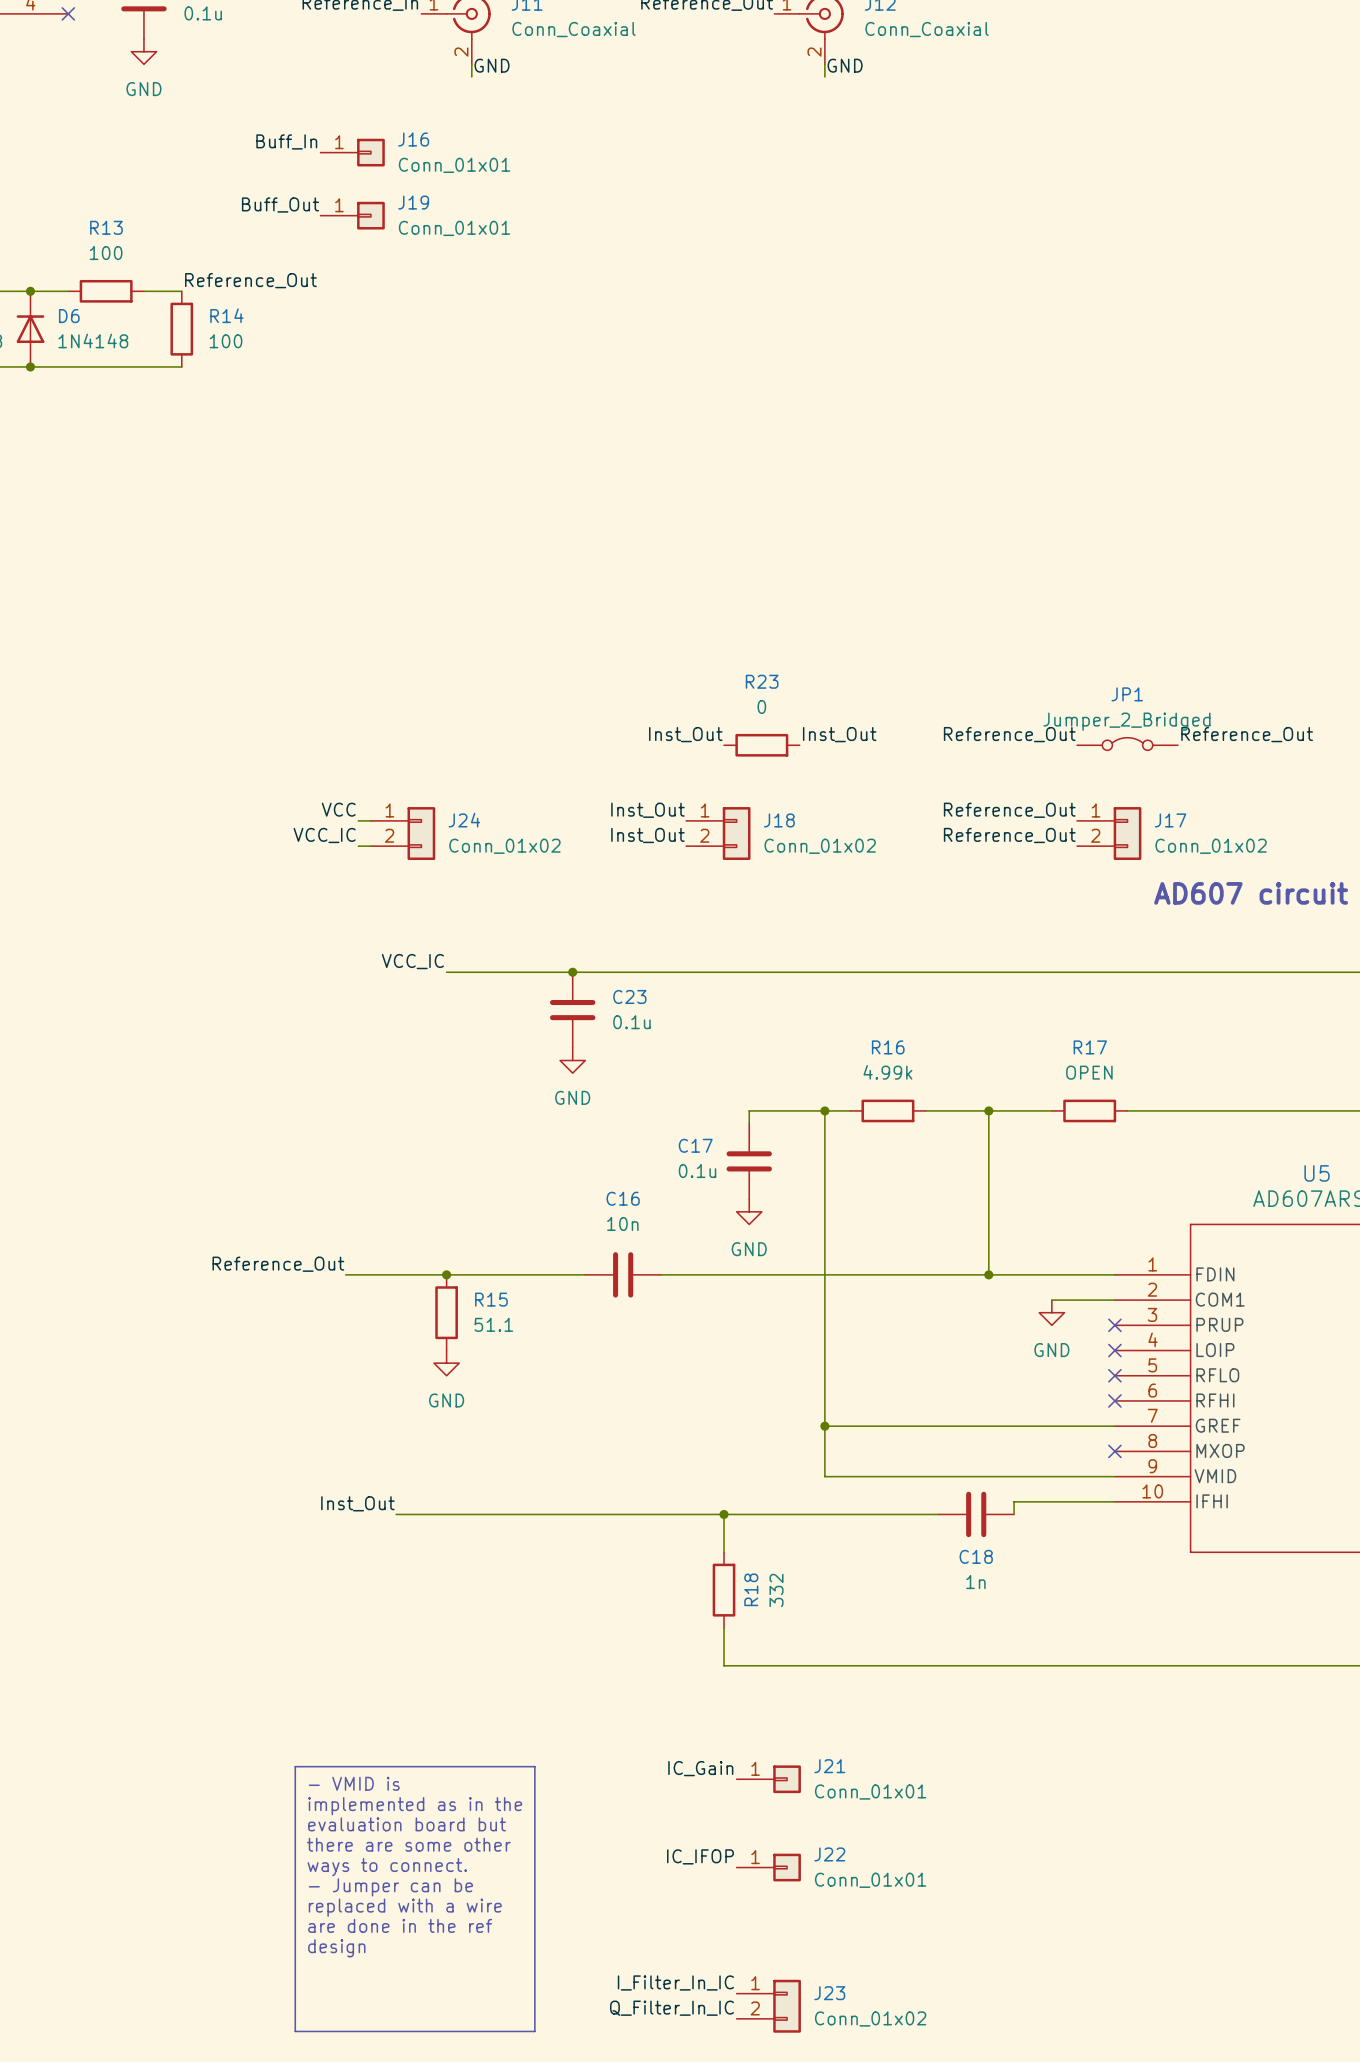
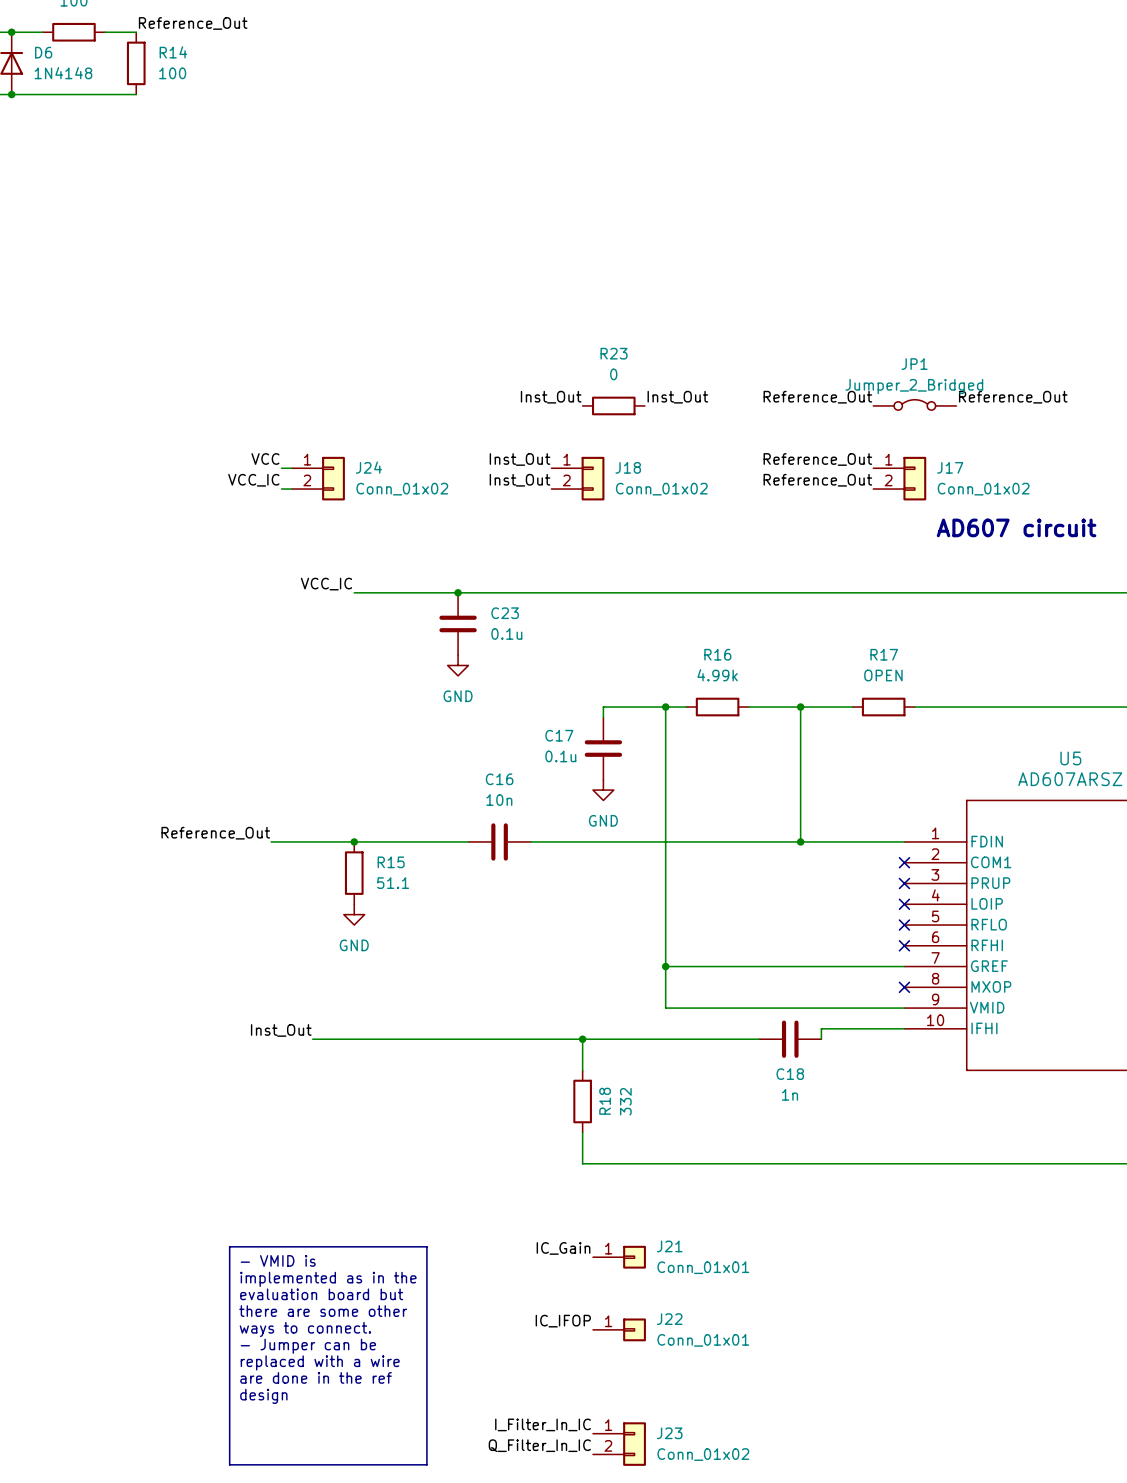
wire: (1051, 1300) (1114, 1300) -> none
no-connect mark: none -> (904, 862)
power symbol: GND (1051, 1312) -> none

